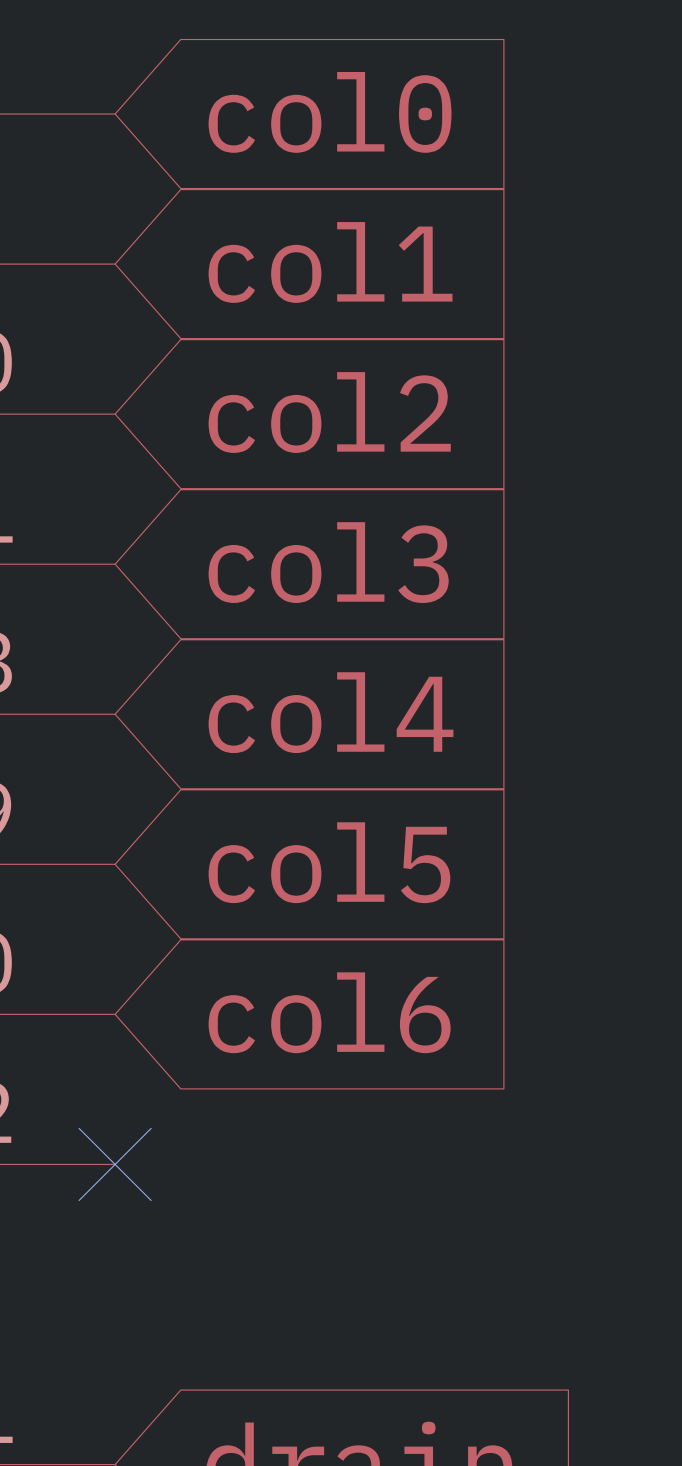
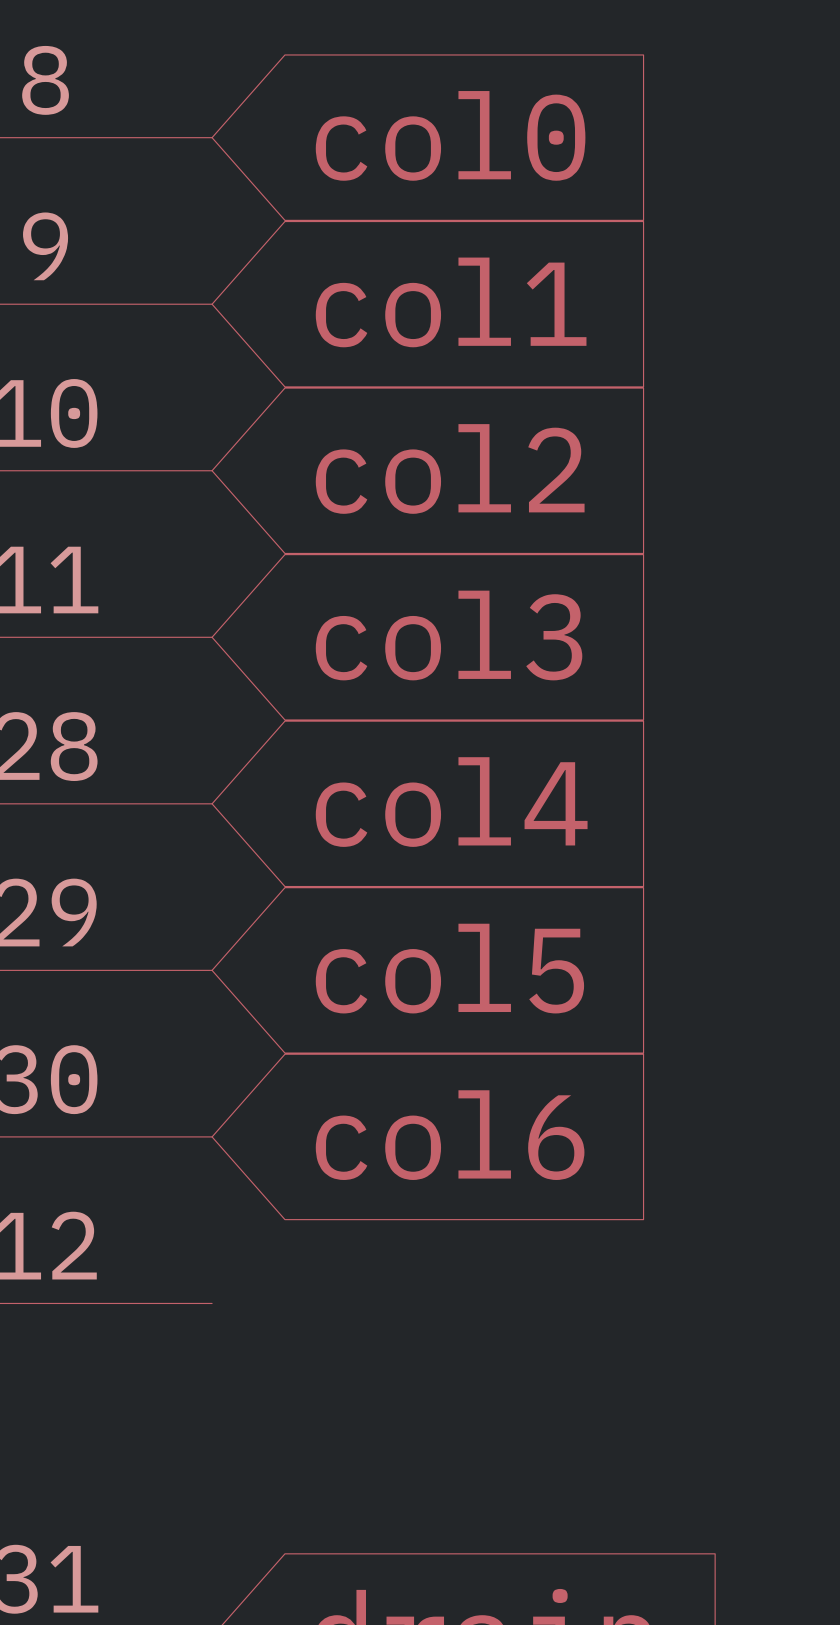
no-connect mark: (115, 1164) -> none

